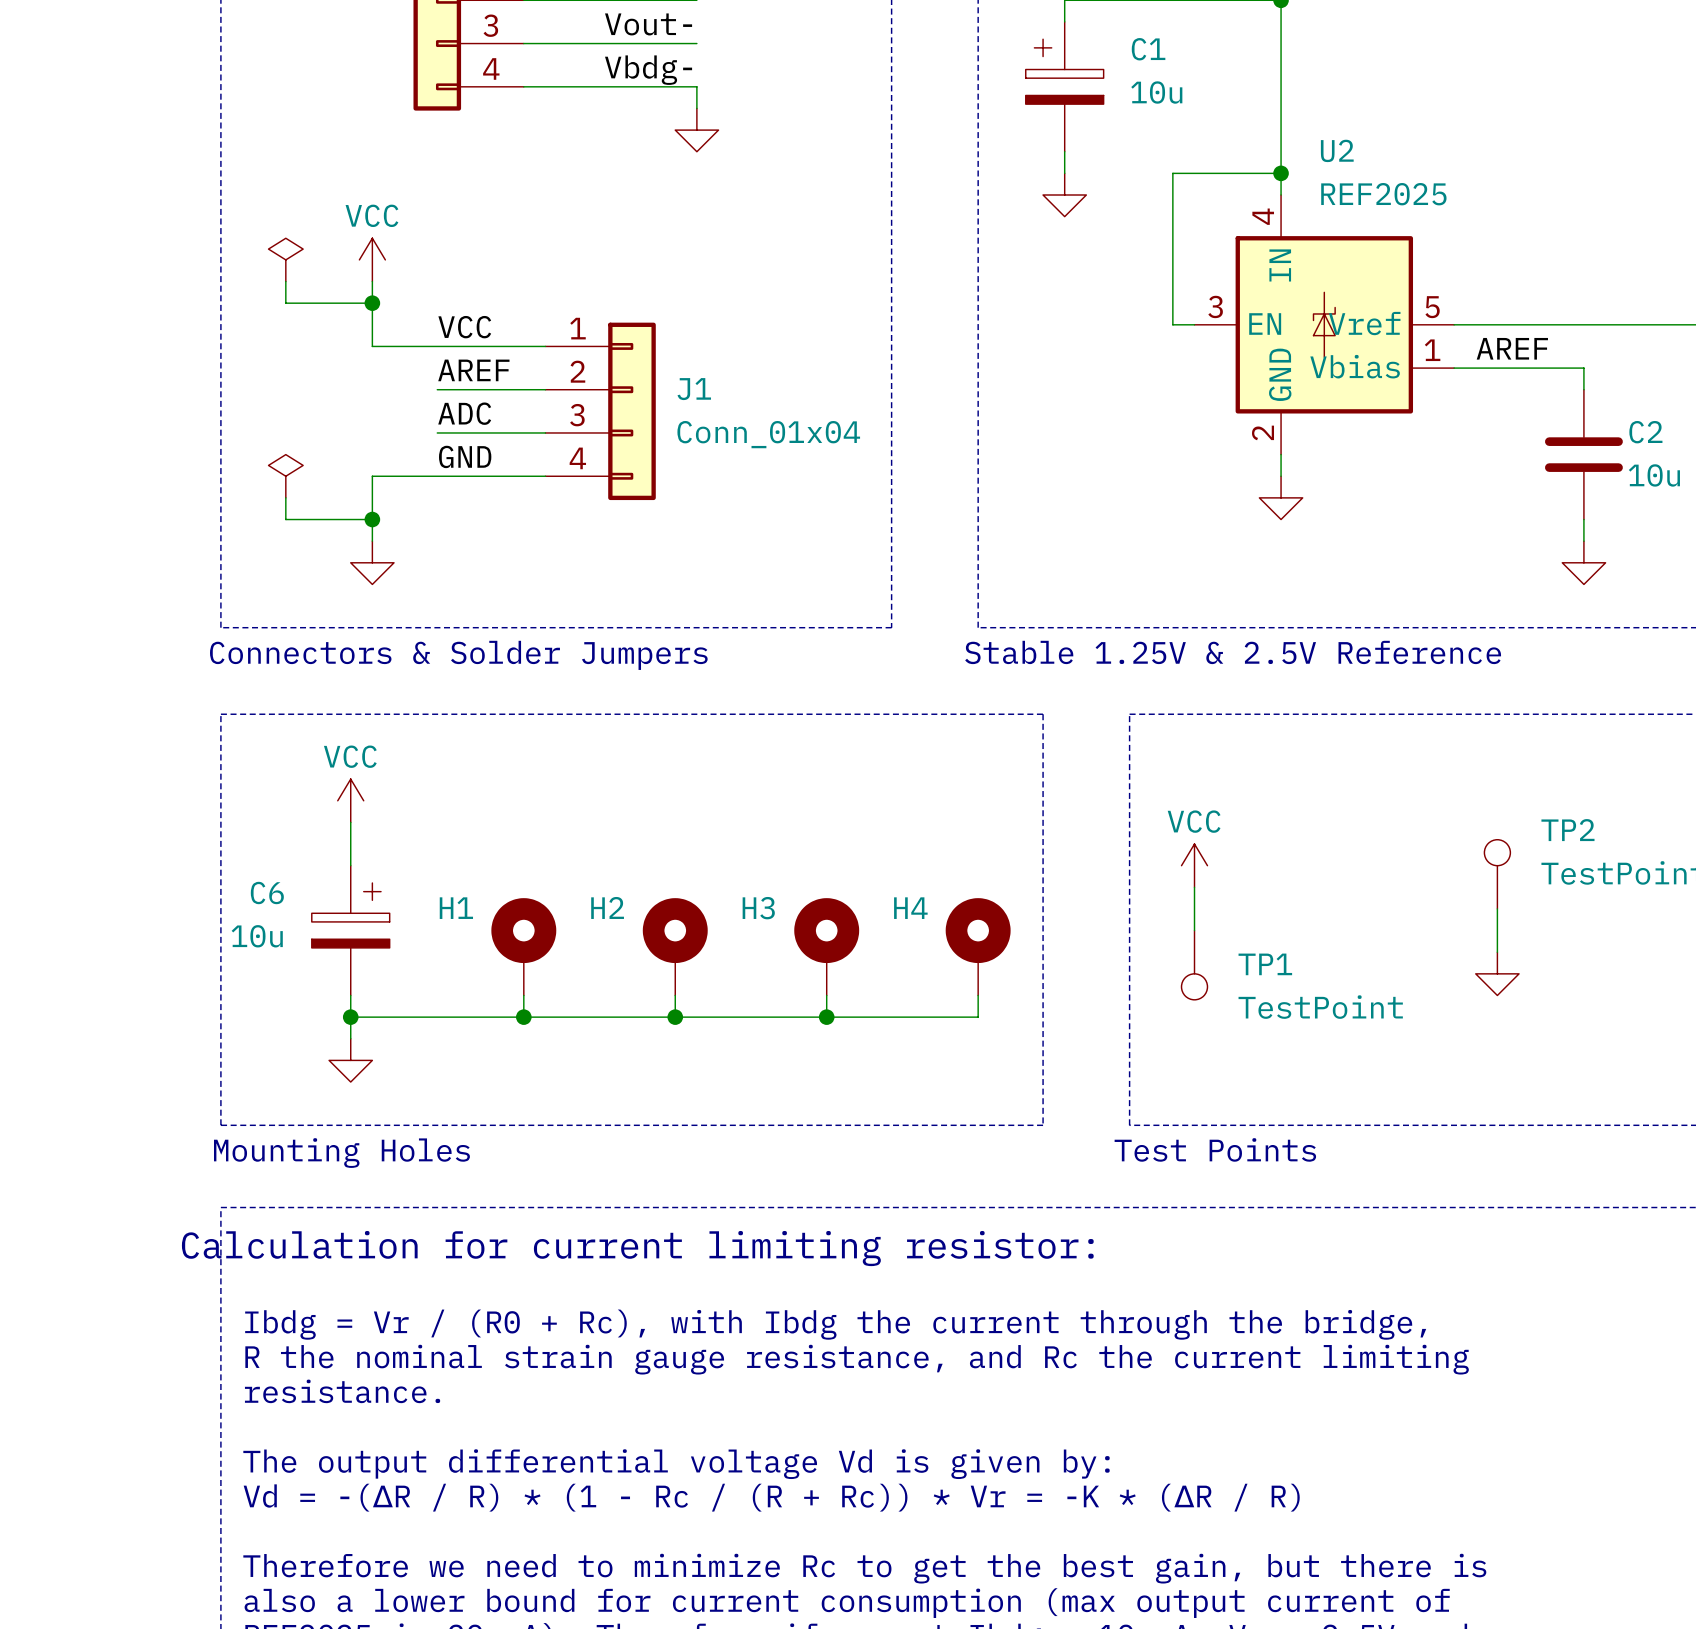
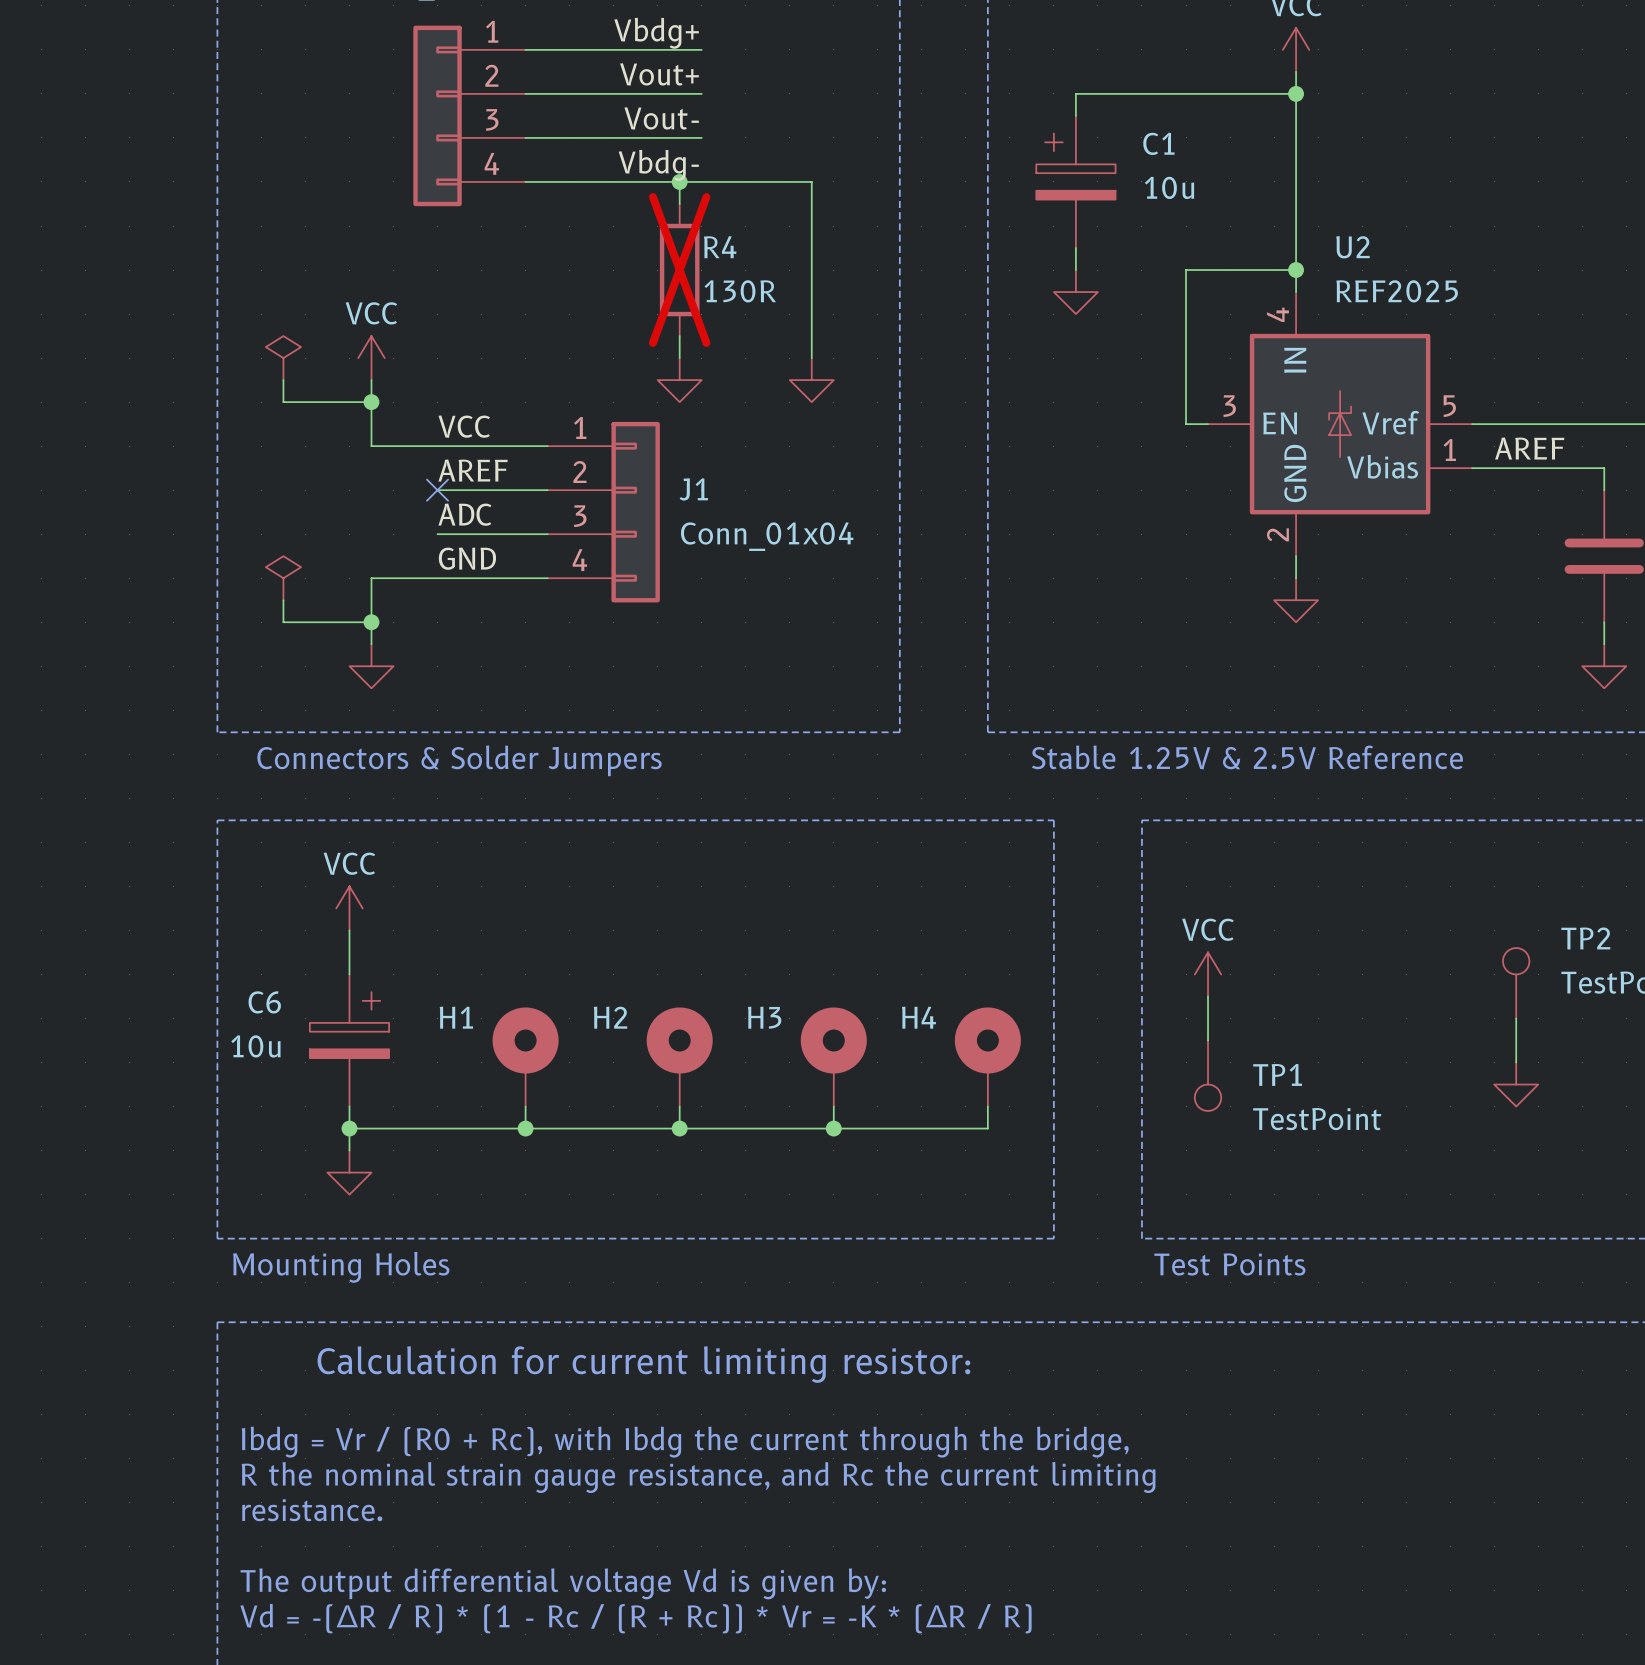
wire: none -> (679, 181) (679, 203)
junction: none -> (679, 181)
wire: (696, 86) (696, 108) -> (701, 181) (811, 181) (811, 358)
power symbol: (696, 130) -> none
R4: none -> 130R (679, 270)
wire: none -> (679, 336) (679, 358)
power symbol: none -> (679, 380)
power symbol: none -> (811, 380)
no-connect mark: none -> (437, 490)

